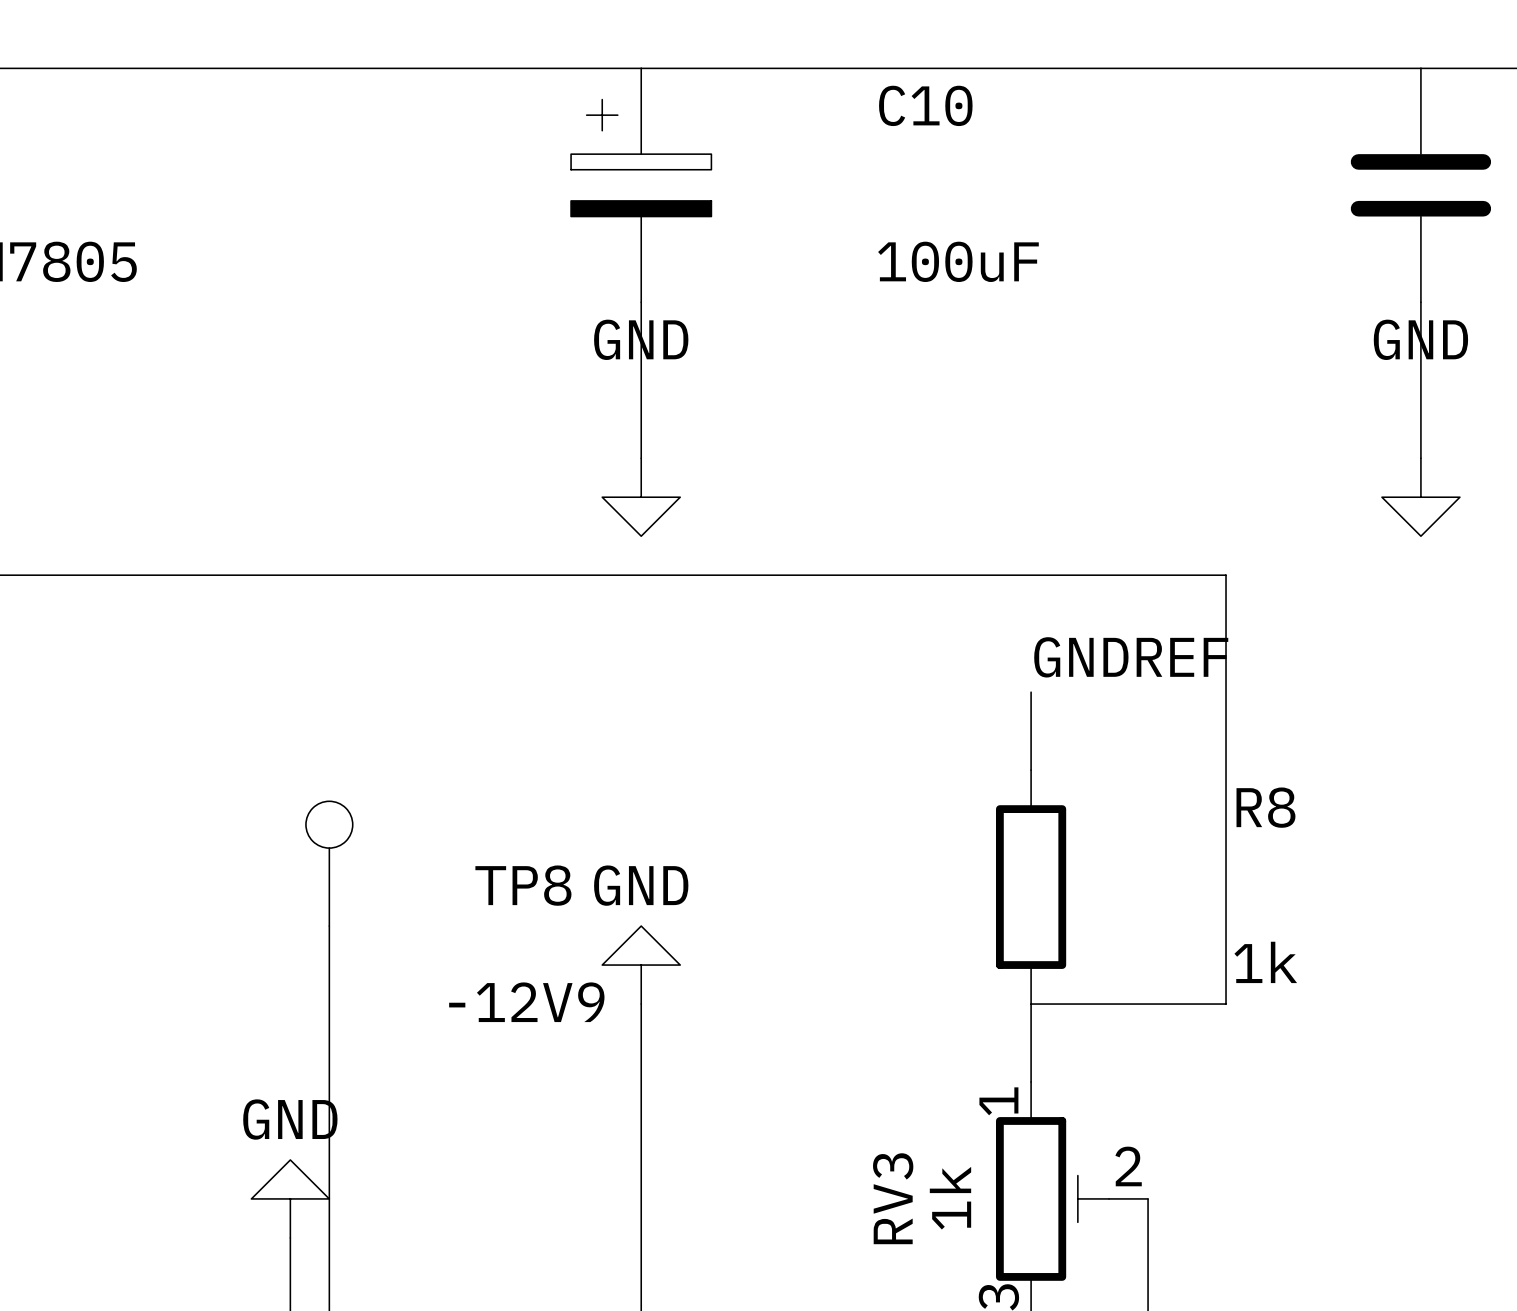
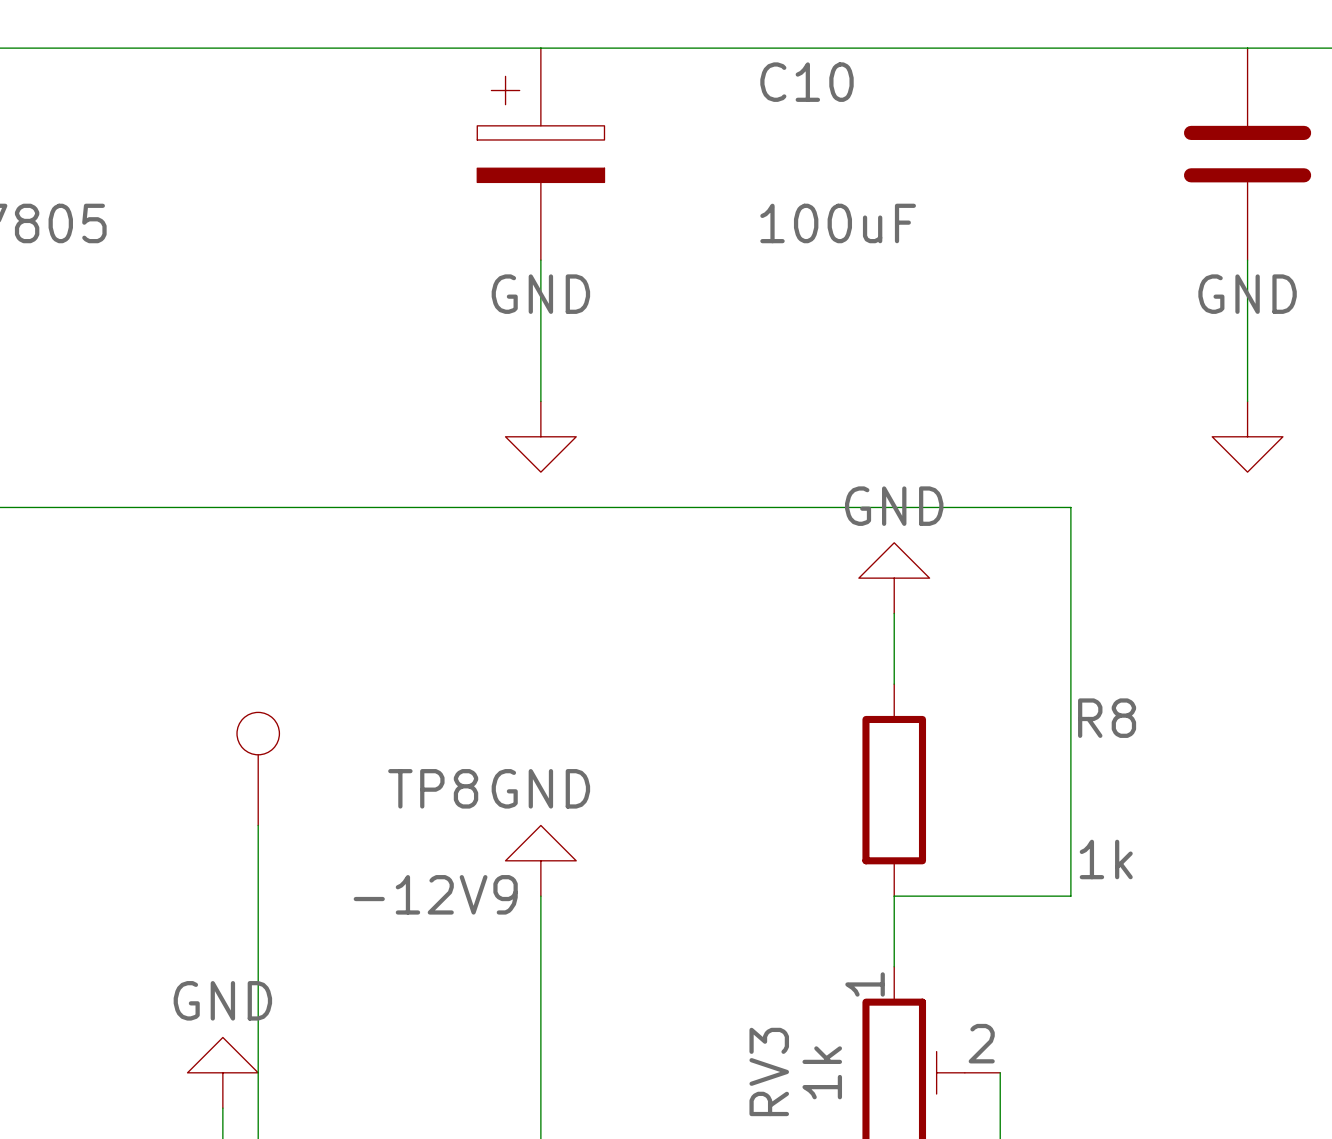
power symbol: none -> GND (894, 578)
label: GNDREF (1131, 657) -> none

